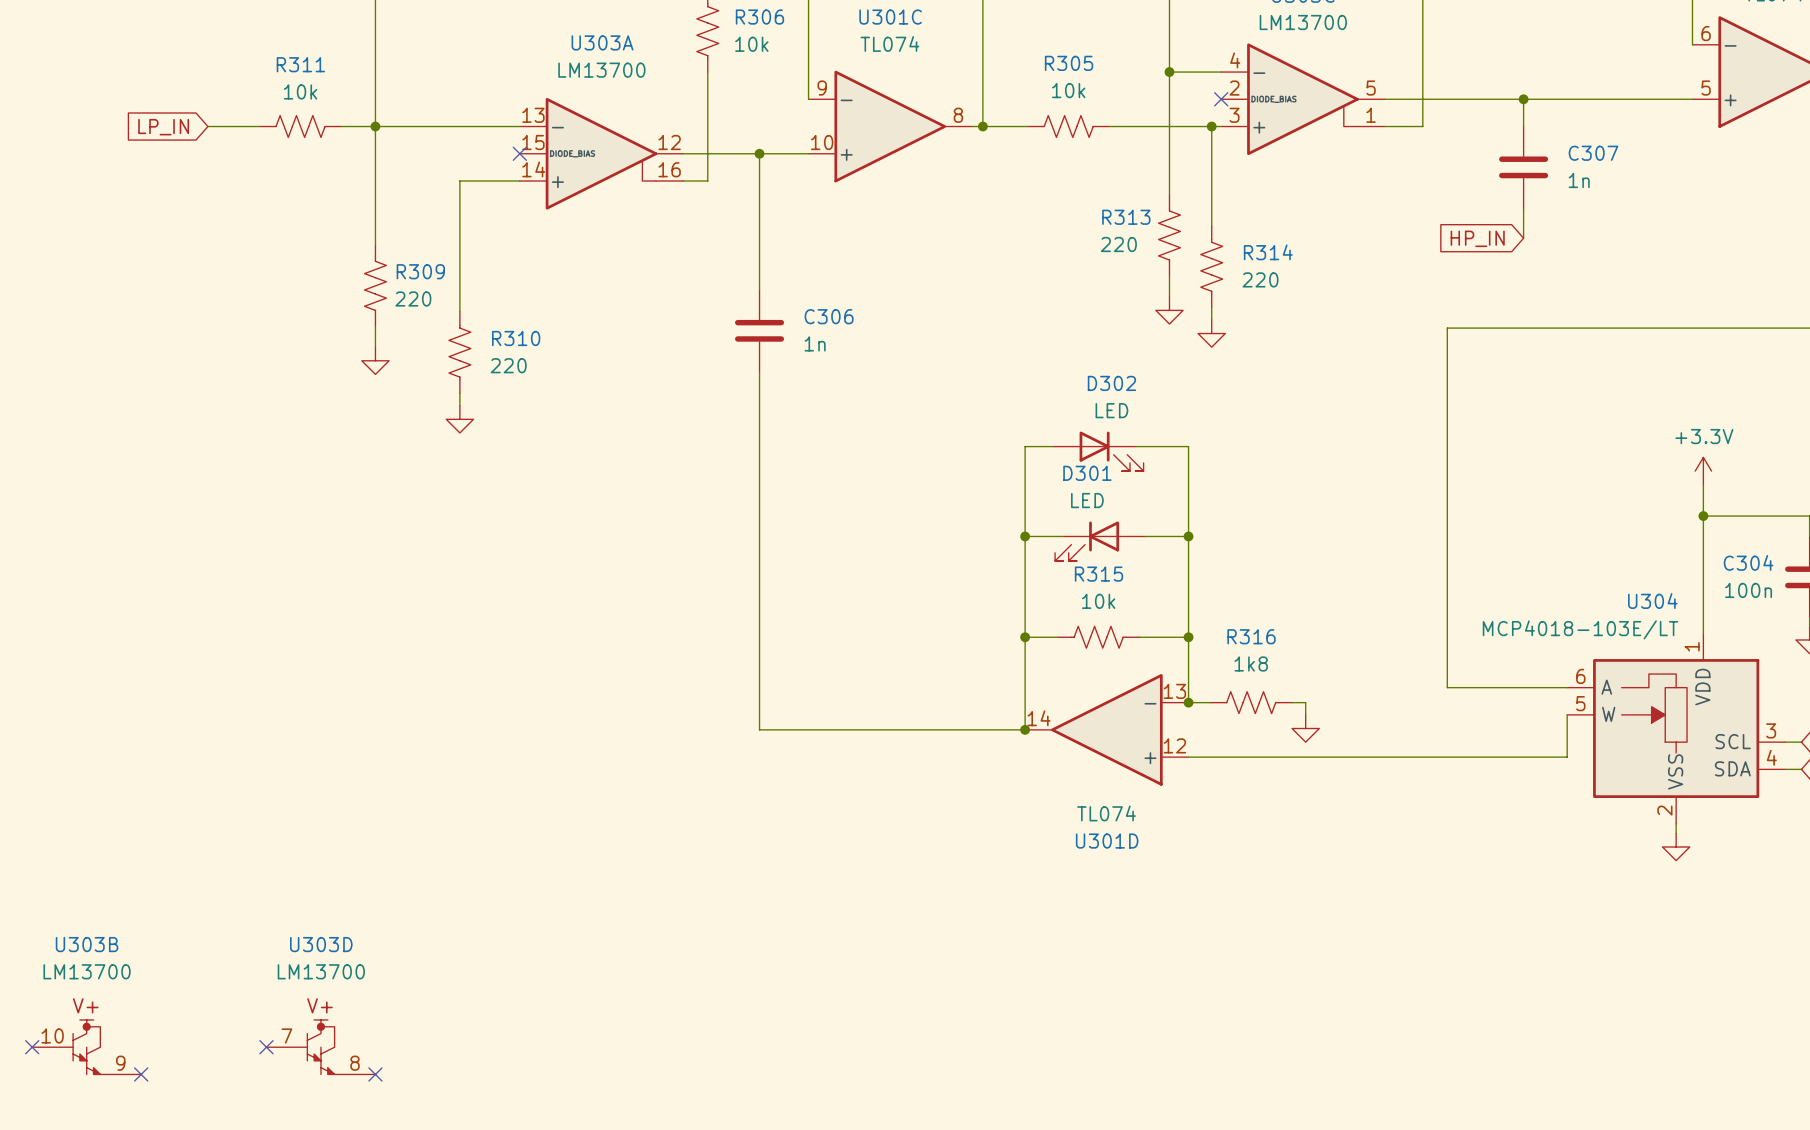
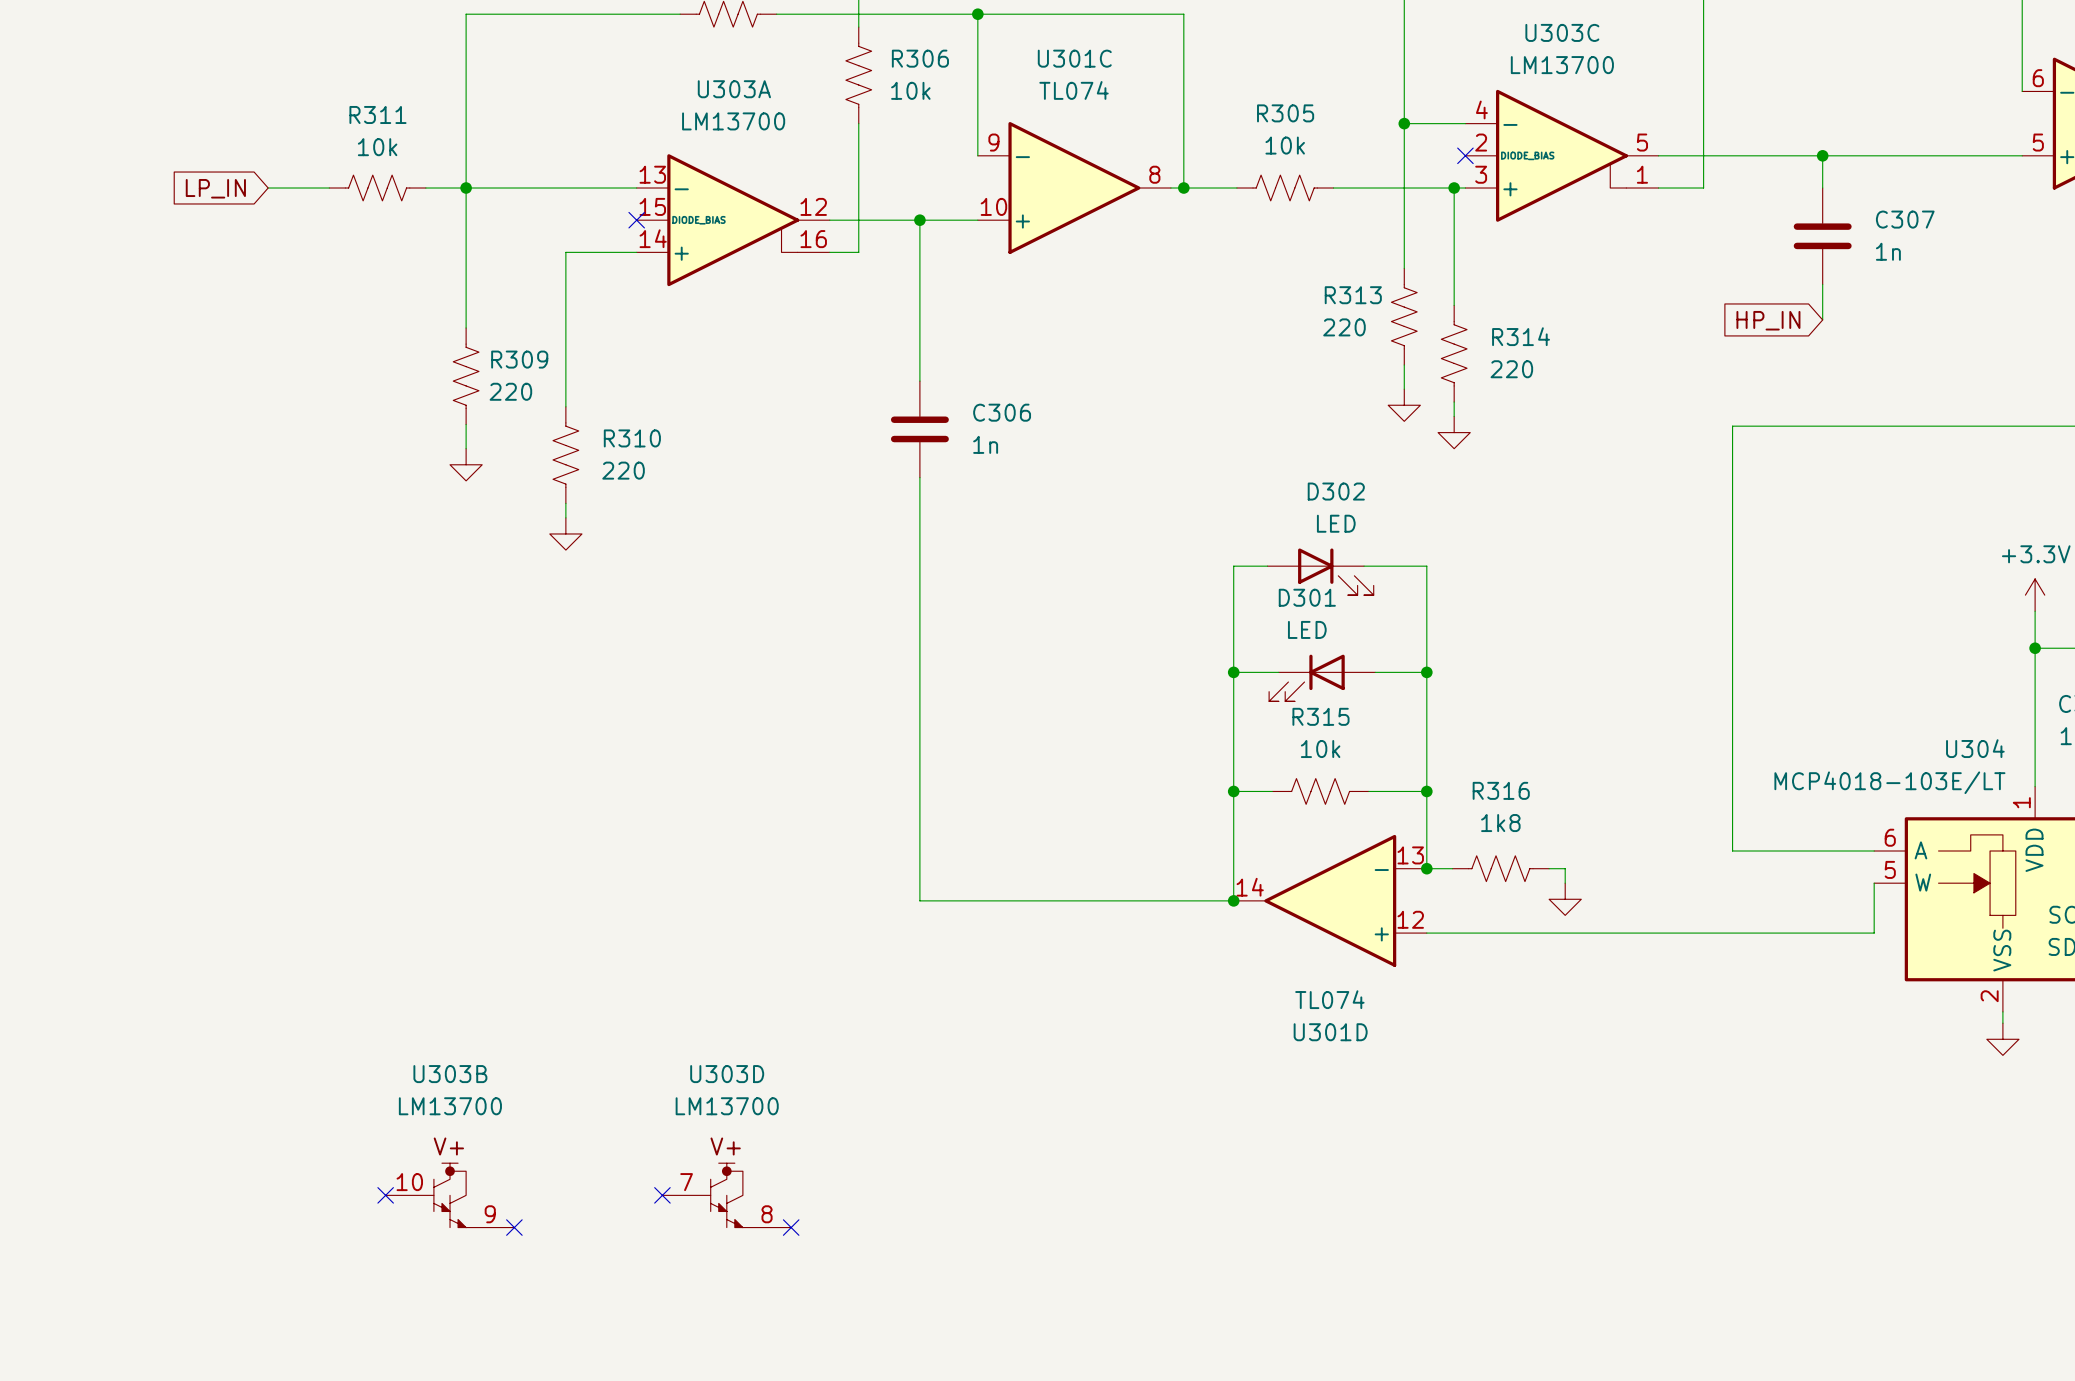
no-connect mark: none -> (385, 1195)
no-connect mark: none -> (662, 1195)
no-connect mark: none -> (514, 1227)
no-connect mark: none -> (791, 1227)
no-connect mark: (32, 1047) -> none
U303B position: (86, 1047) -> (450, 1195)
no-connect mark: (266, 1047) -> none
U303D position: (320, 1047) -> (726, 1195)
no-connect mark: (141, 1074) -> none
no-connect mark: (375, 1074) -> none

